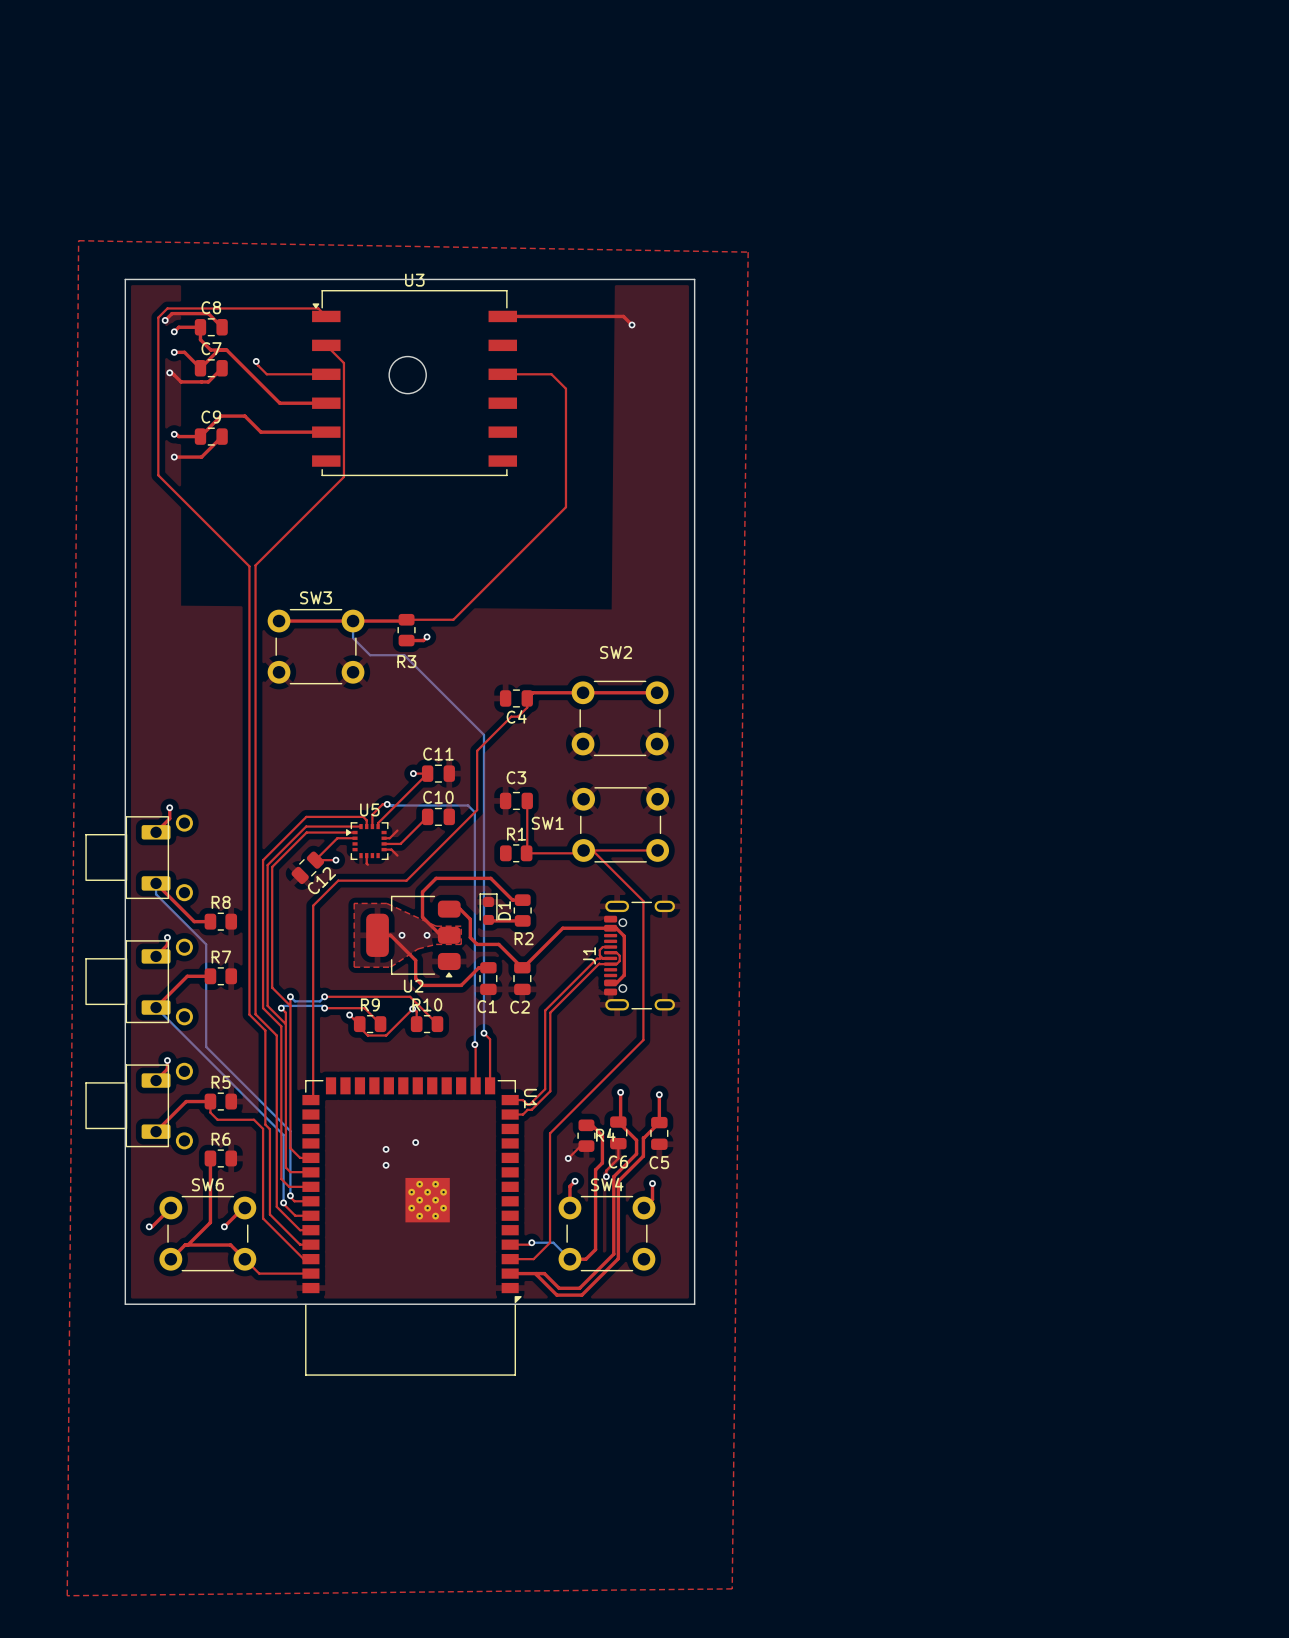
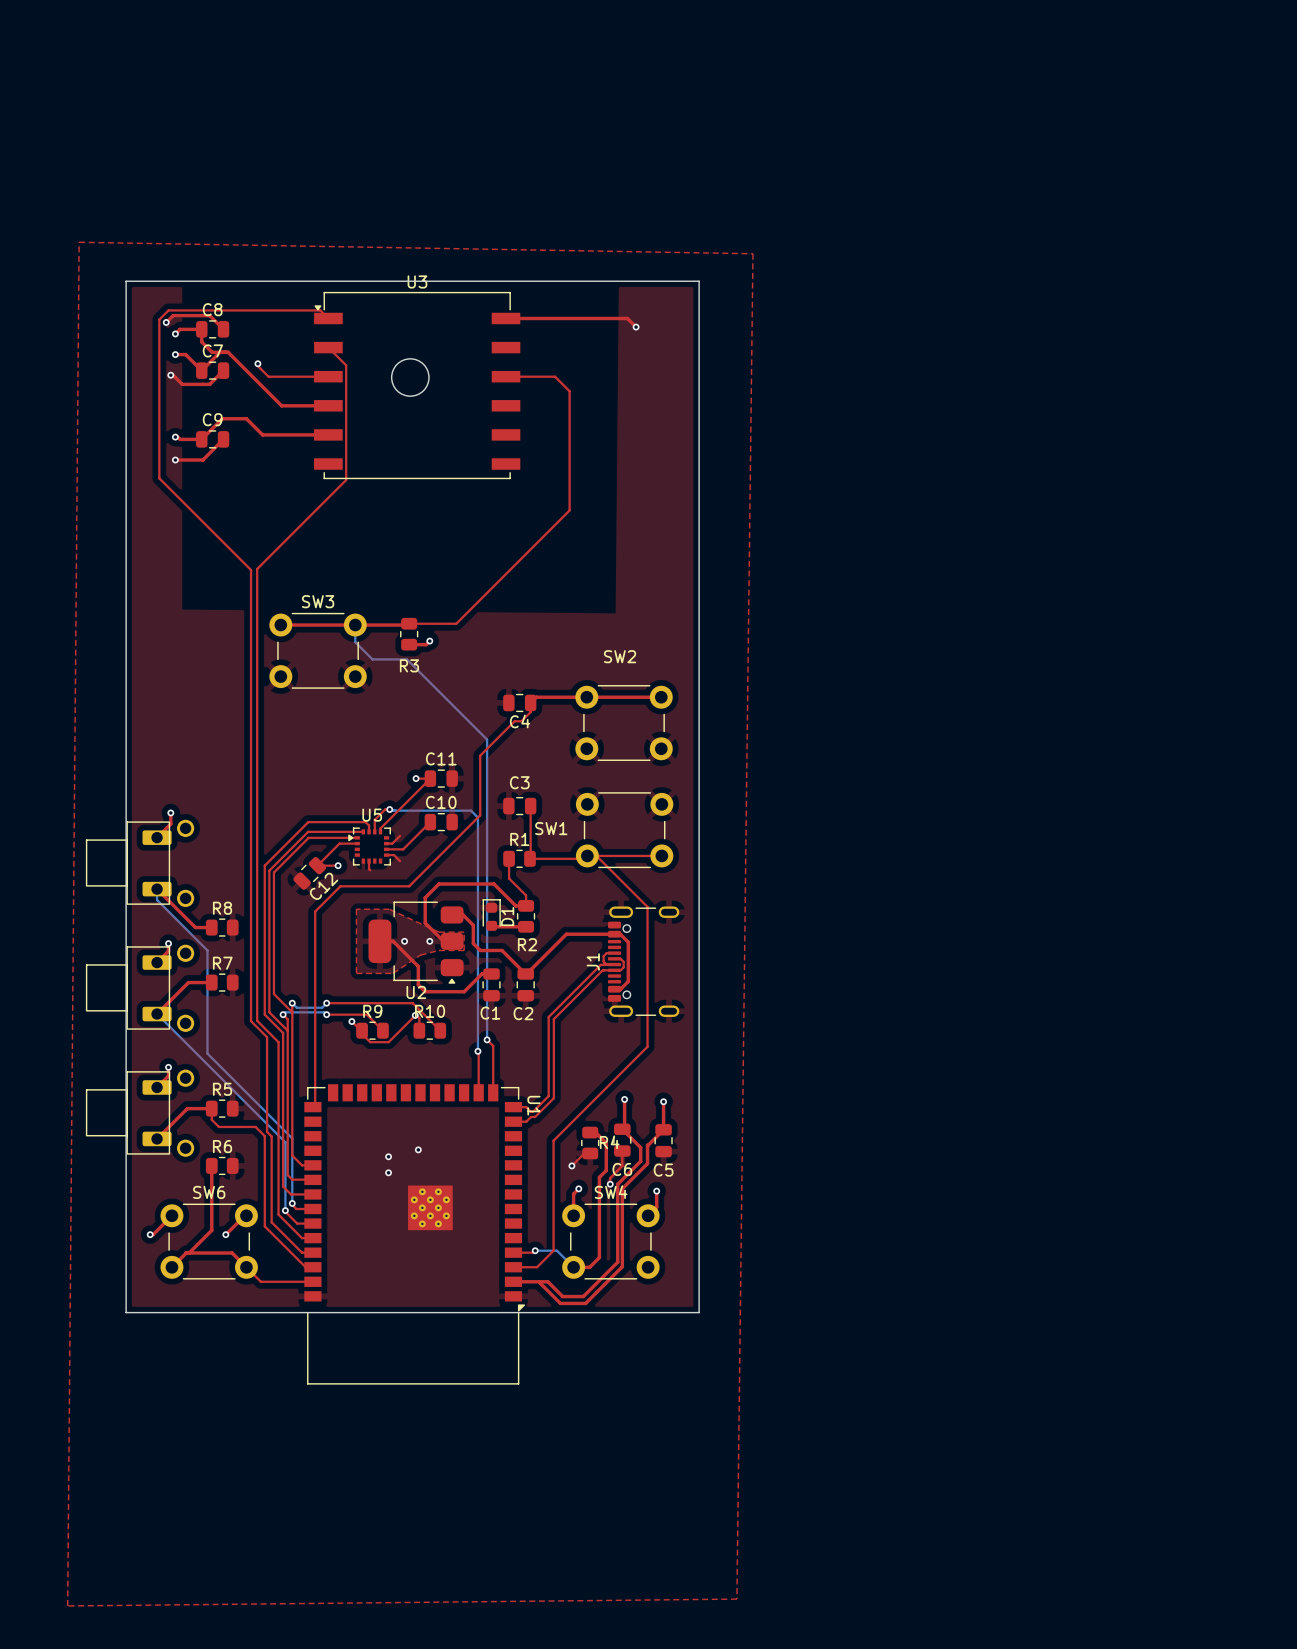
top track: none -> (509, 858) (509, 878) (526, 895) (526, 905)

